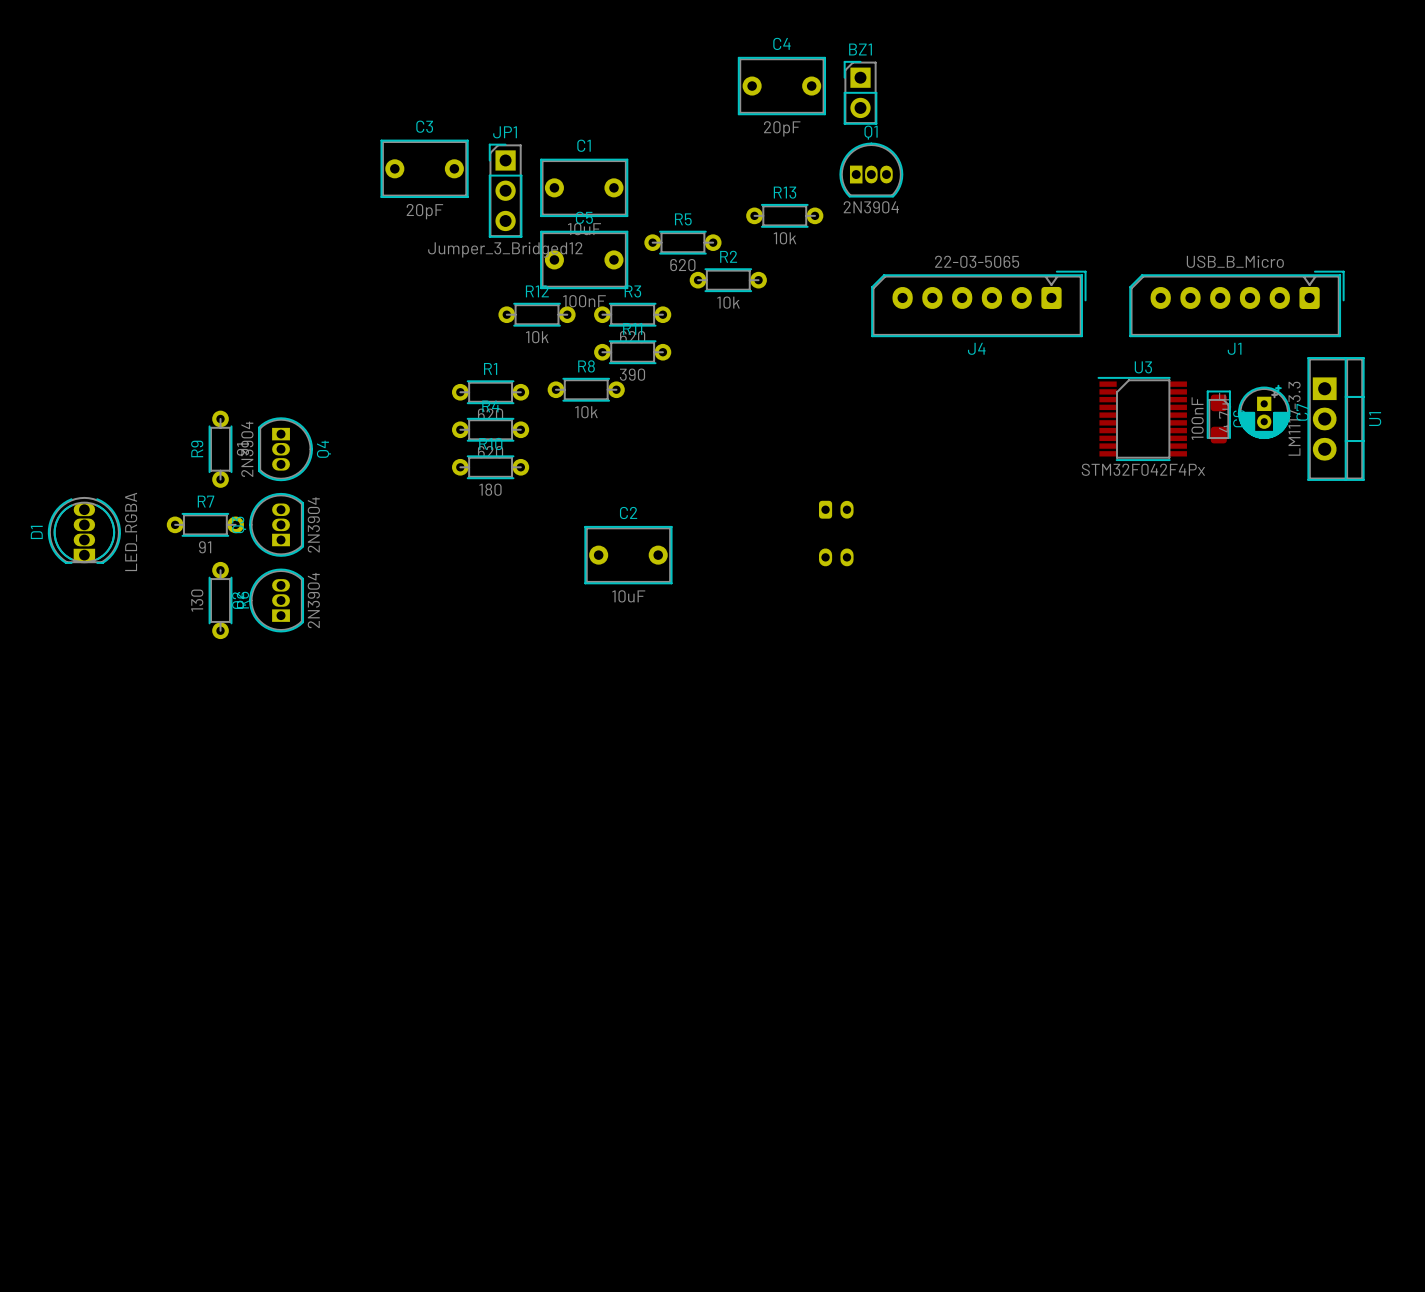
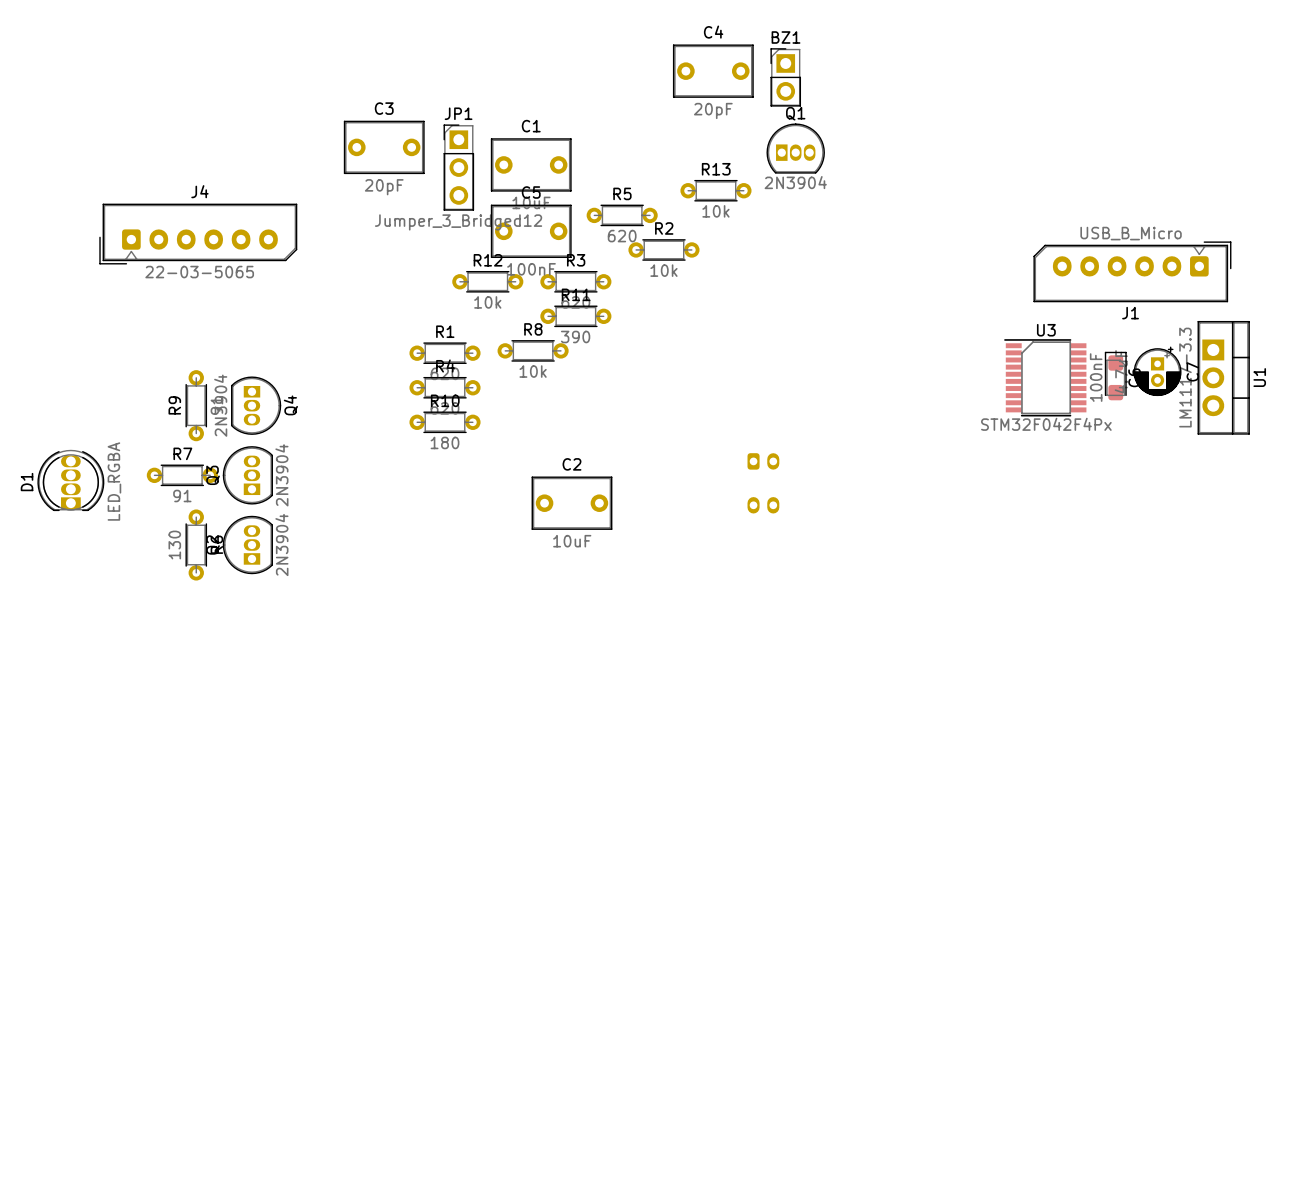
J4 rotation: 0° (978, 303) -> 180° (198, 234)
J4 position: (978, 303) -> (198, 234)

